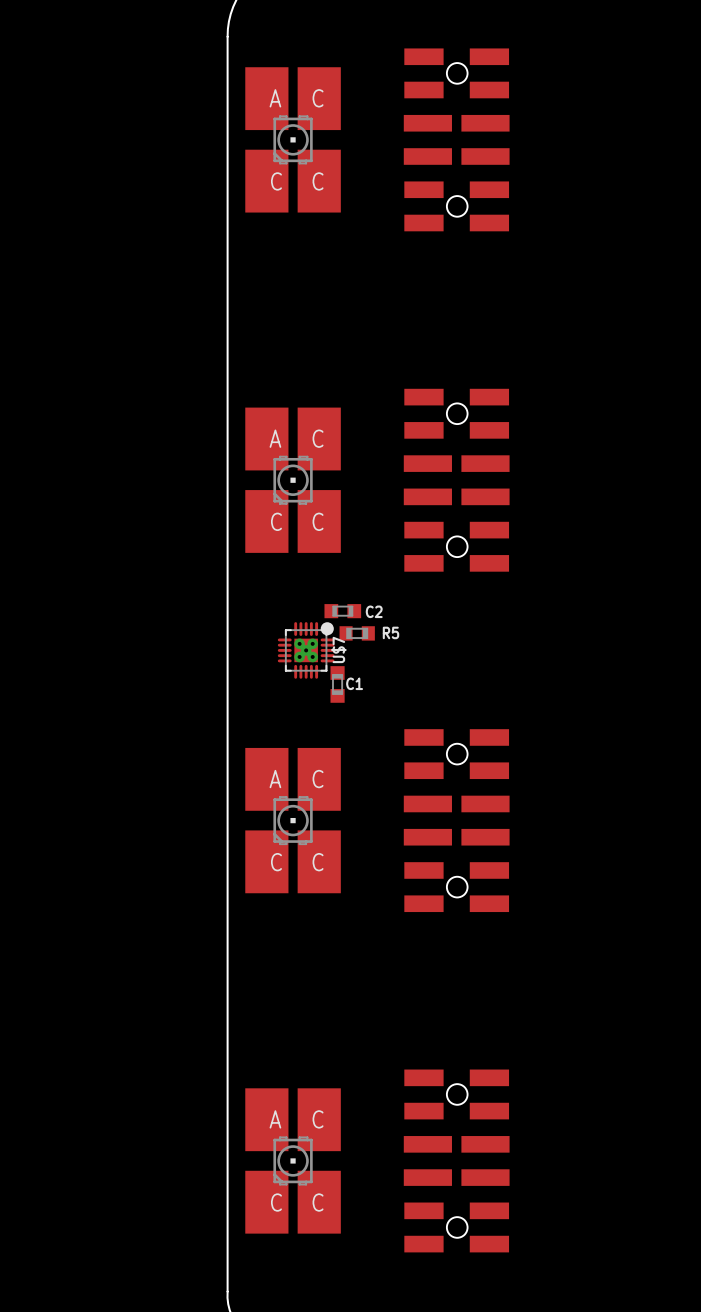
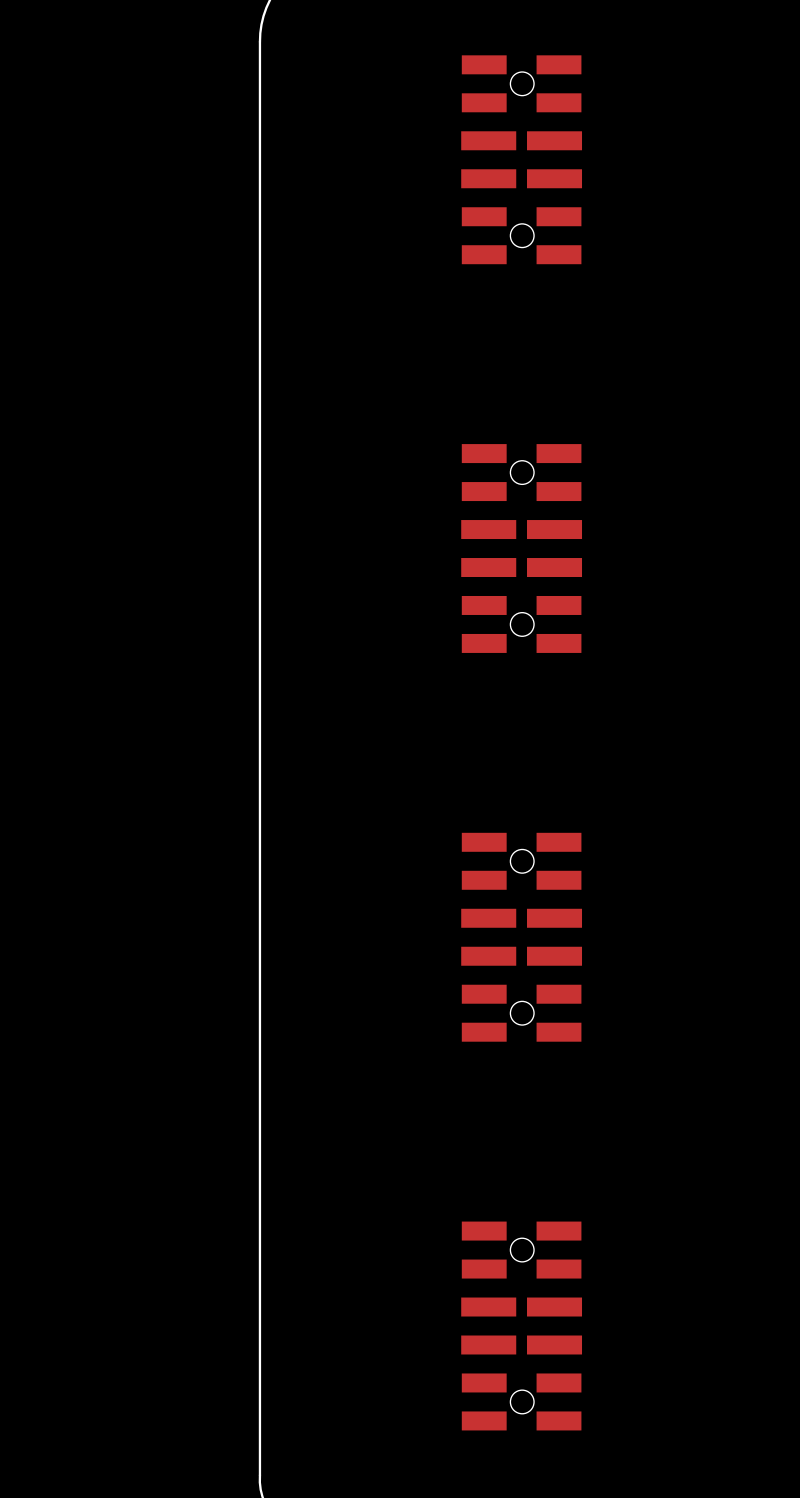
part: (293, 139) -> none
part: (293, 480) -> none
C2: (342, 611) -> none
R5: (357, 633) -> none
U$7: (306, 650) -> none
C1: (337, 684) -> none
part: (293, 820) -> none
part: (293, 1160) -> none

